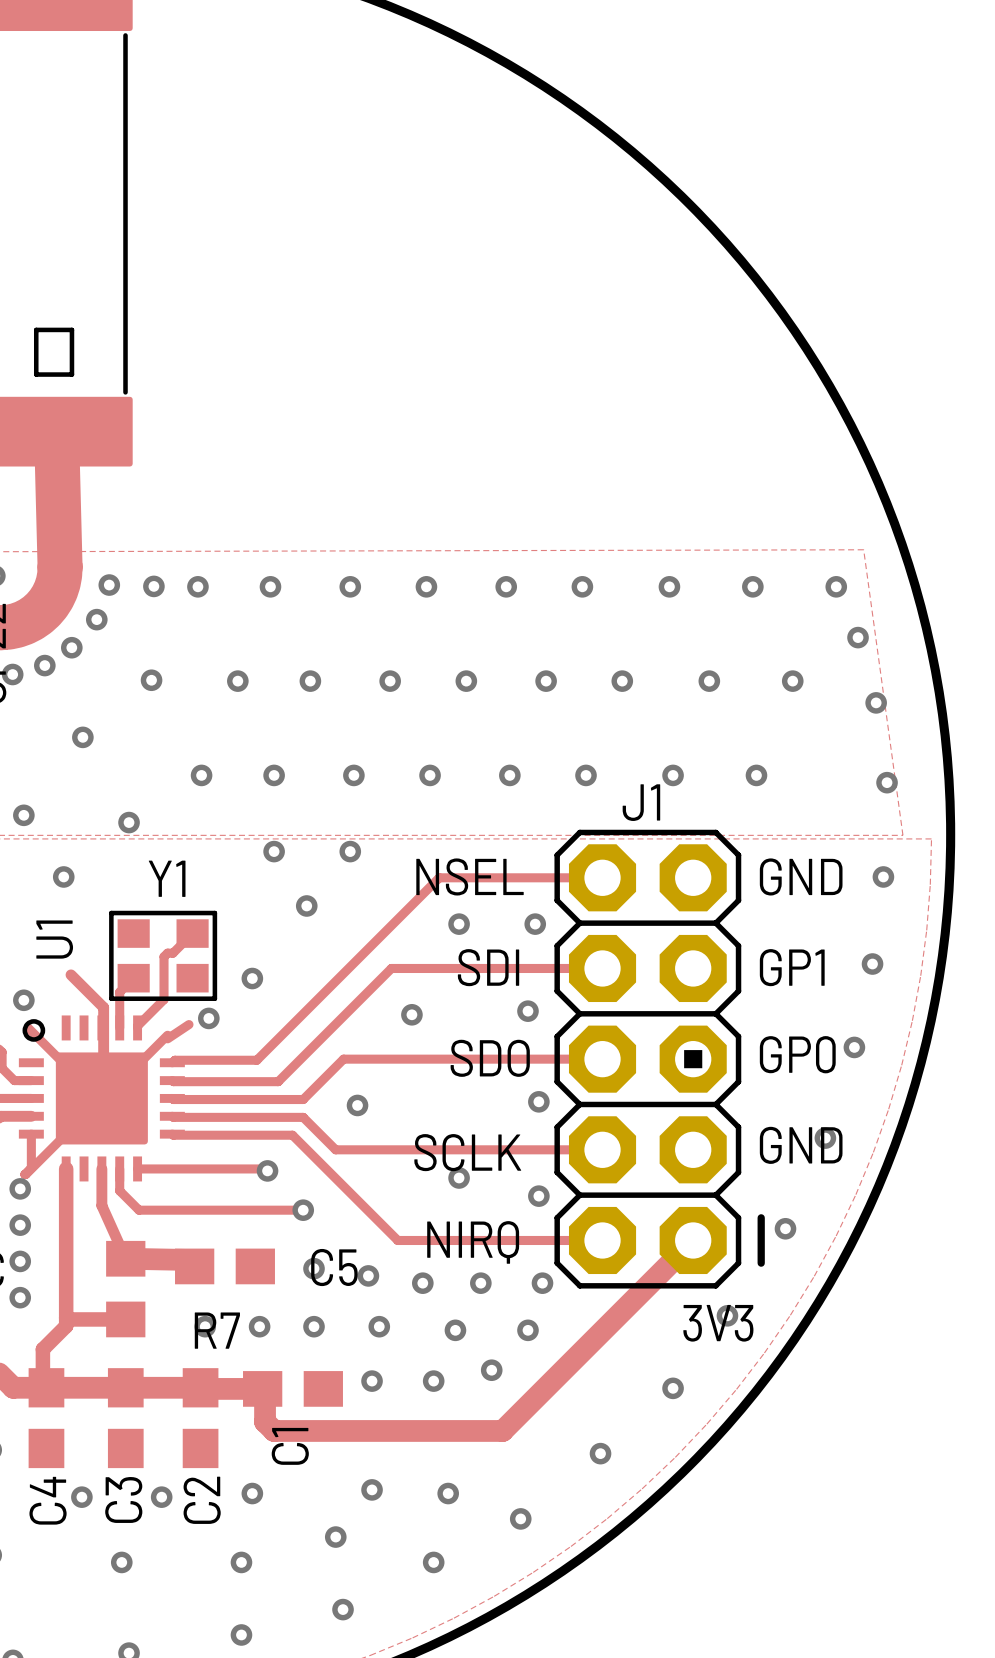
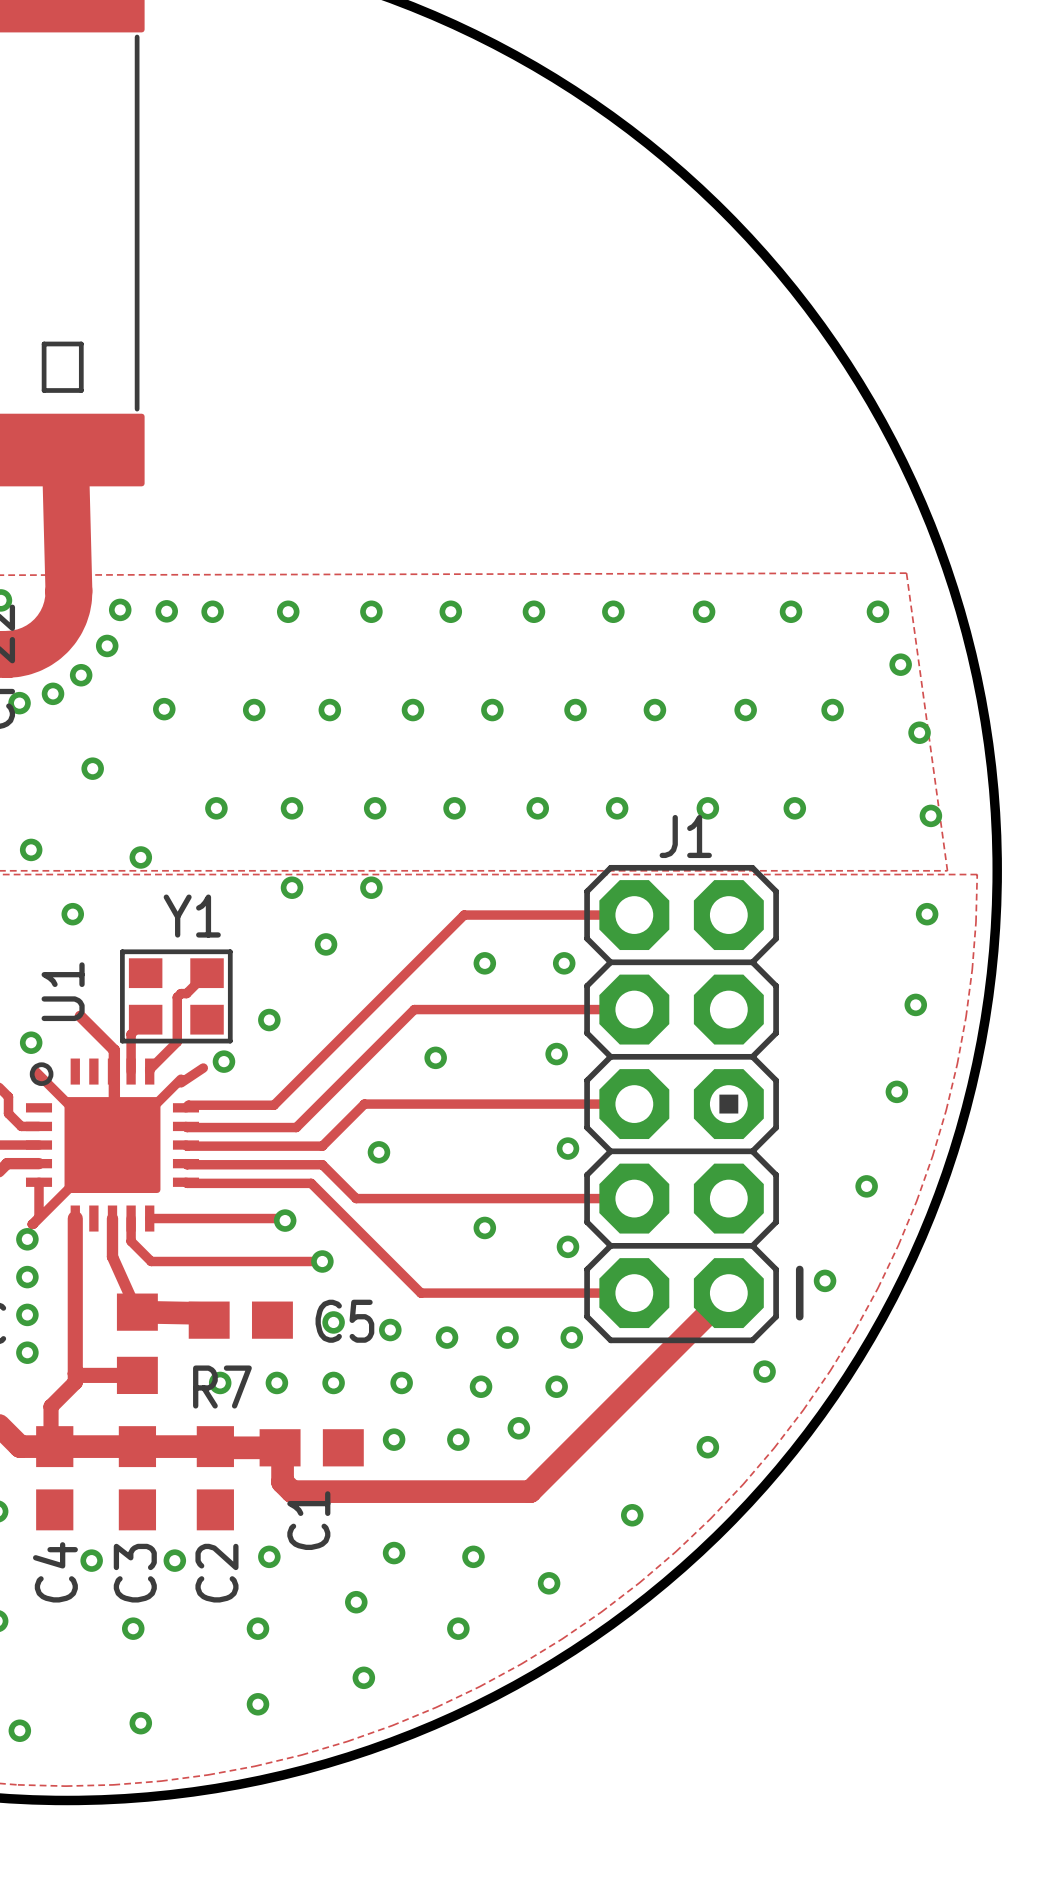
text: NSEL (470, 876) -> none
text: GND (801, 876) -> none
text: SDI (488, 967) -> none
text: GP1 (792, 967) -> none
text: GP0 (797, 1054) -> none
text: SDO (490, 1058) -> none
text: GND (801, 1145) -> none
text: SCLK (467, 1152) -> none
text: NIRQ (473, 1242) -> none
text: 3V3 (718, 1323) -> none

